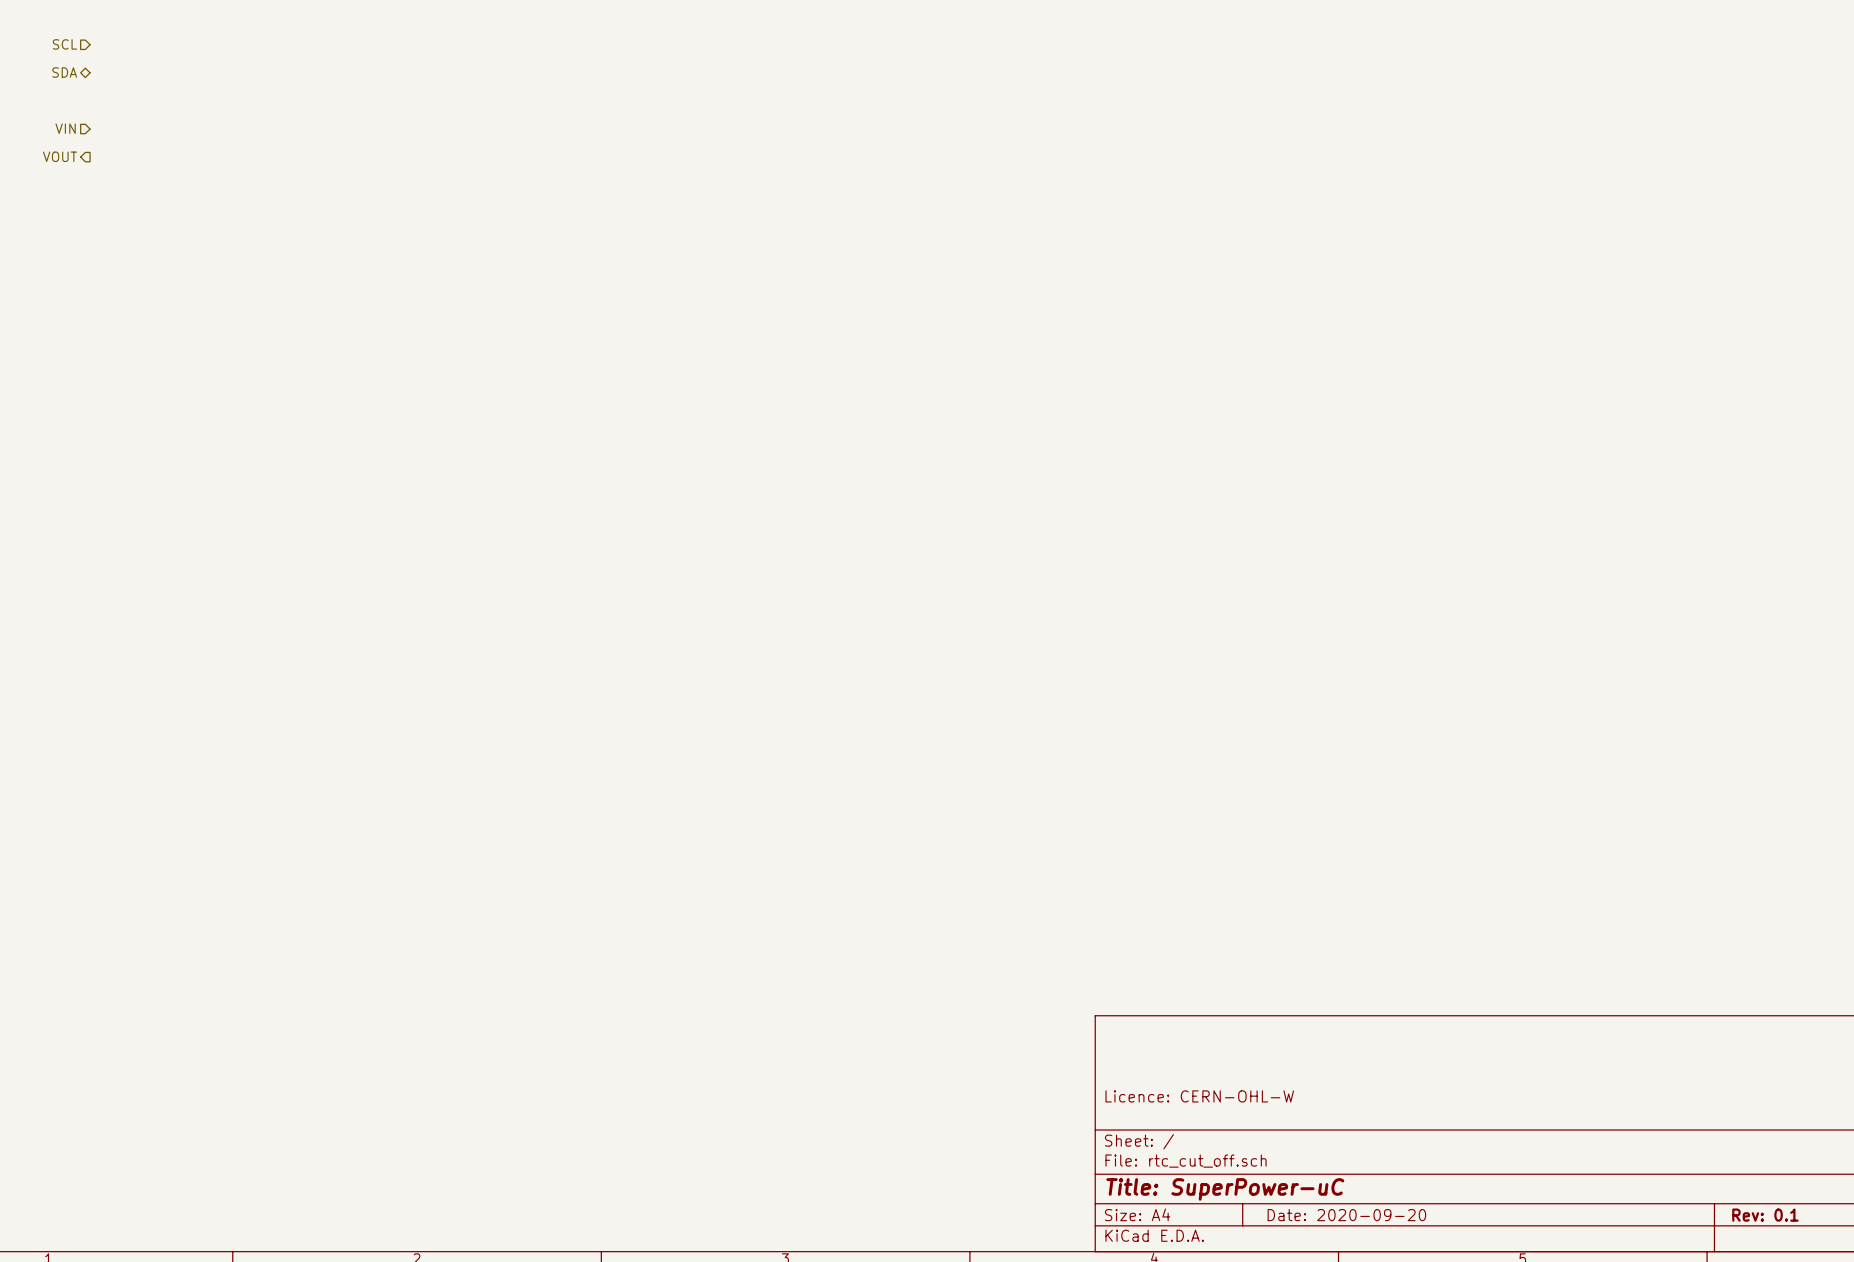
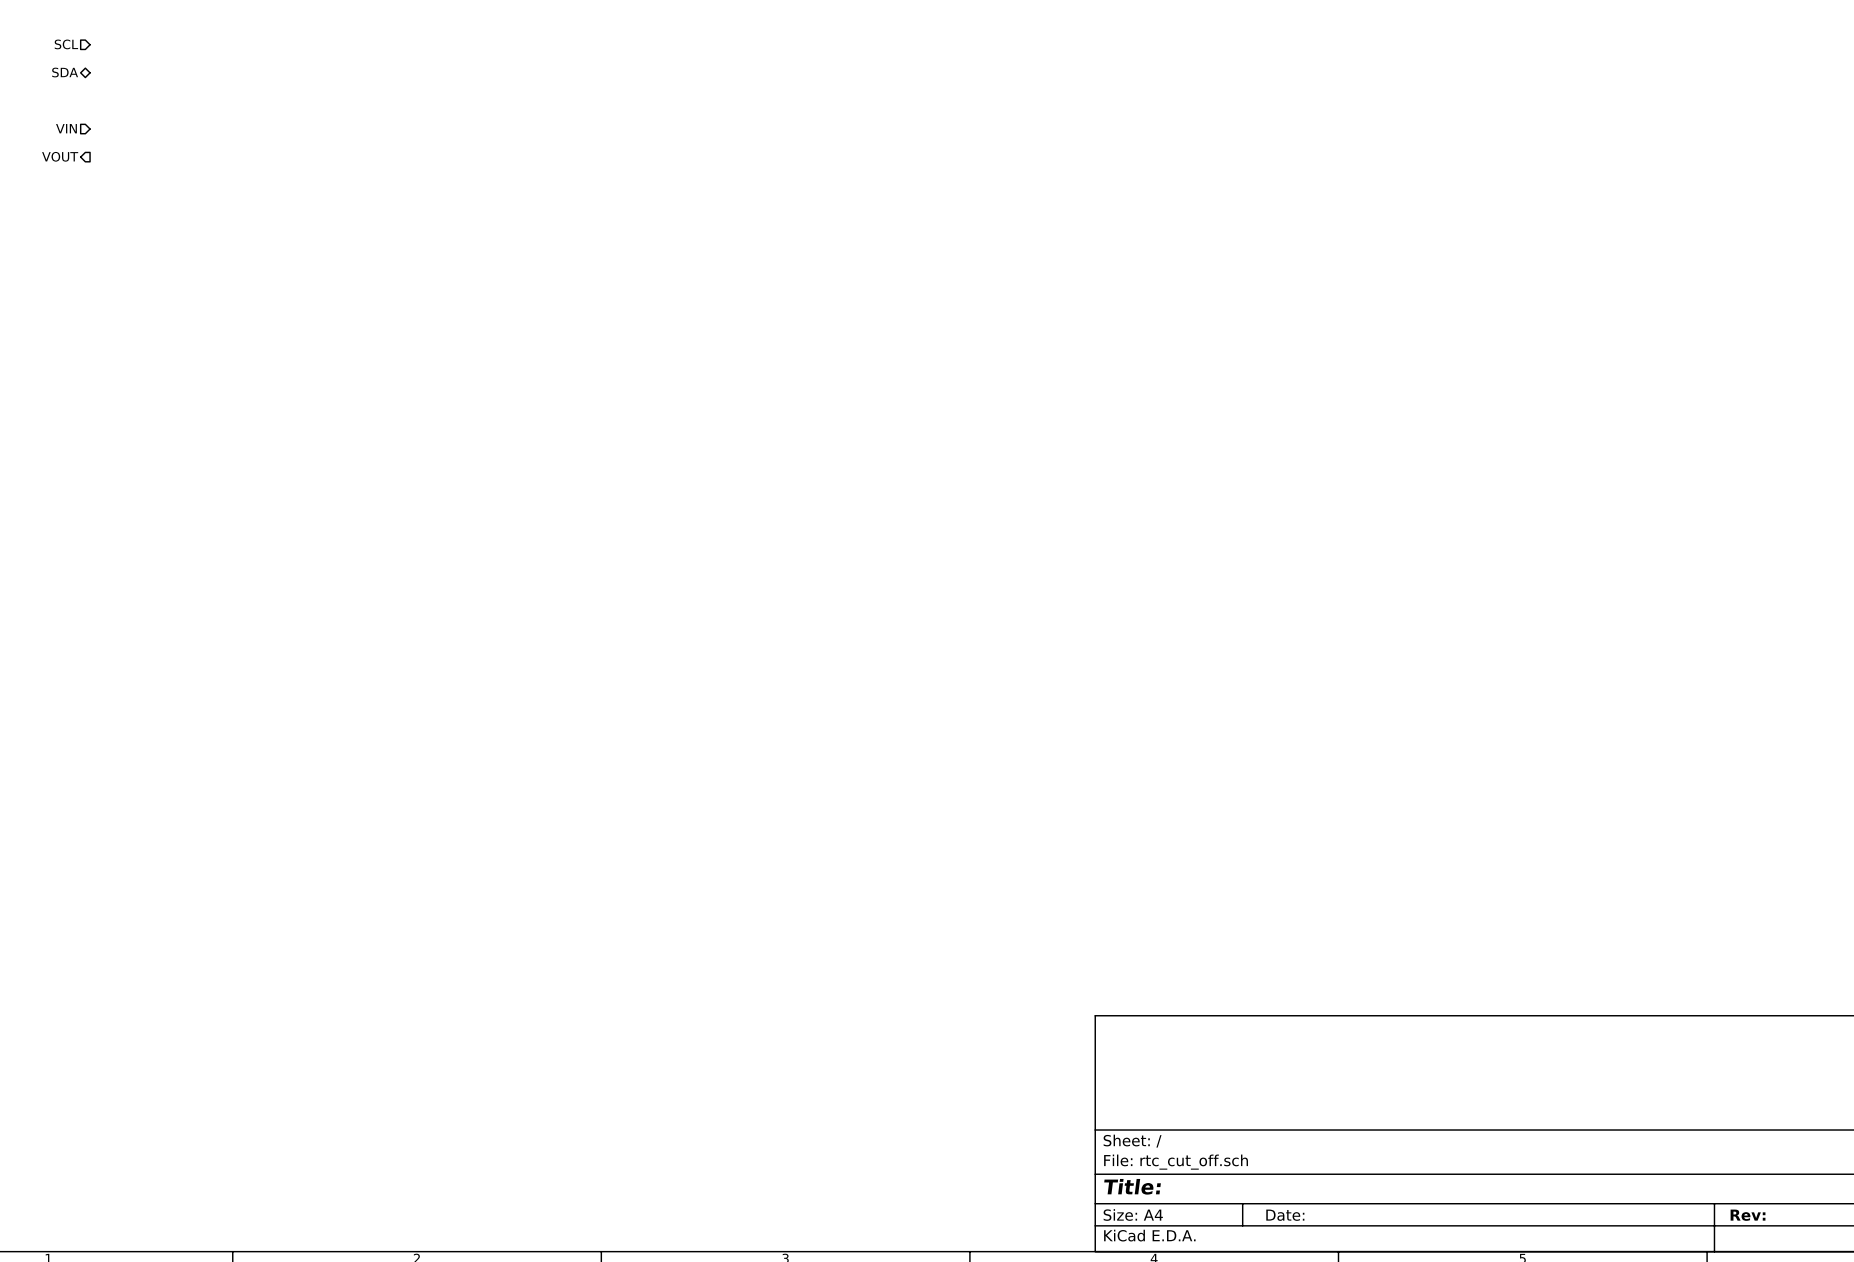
title block: Licence: CERN-OHL-W (1199, 1096) -> none
title block: Title: SuperPower-uC (1225, 1189) -> Title: (1132, 1186)
title block: Date: 2020-09-20 (1346, 1215) -> Date: (1285, 1215)
title block: Rev: 0.1 (1765, 1215) -> Rev: (1748, 1215)

